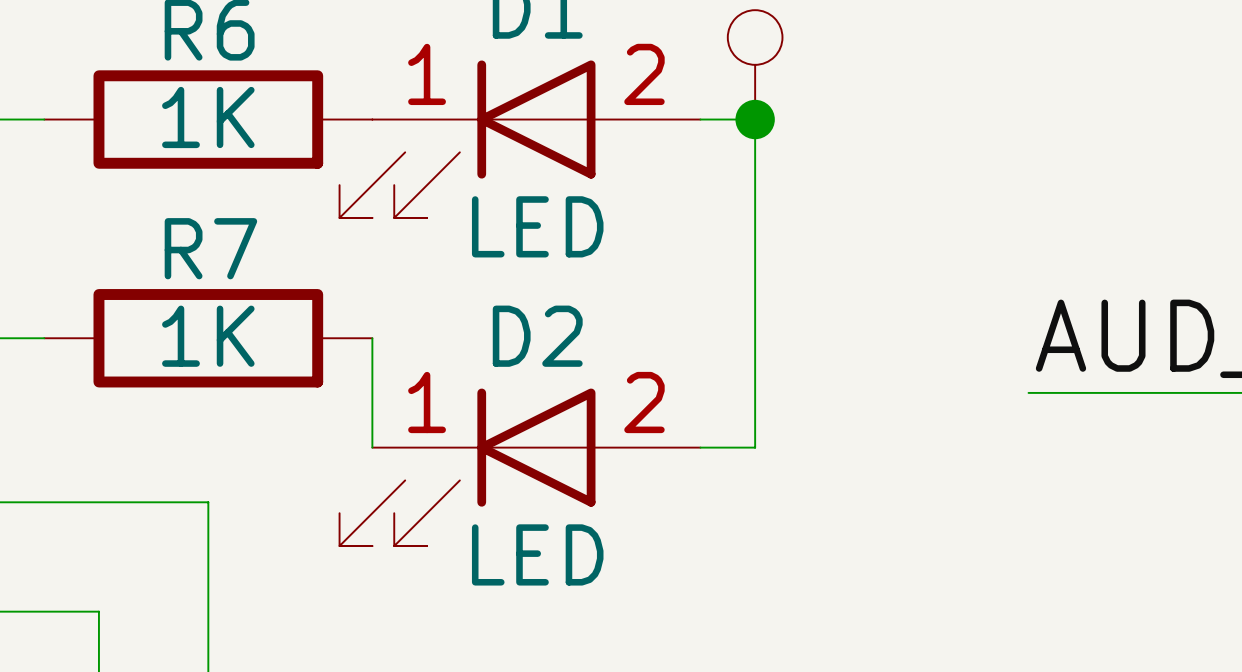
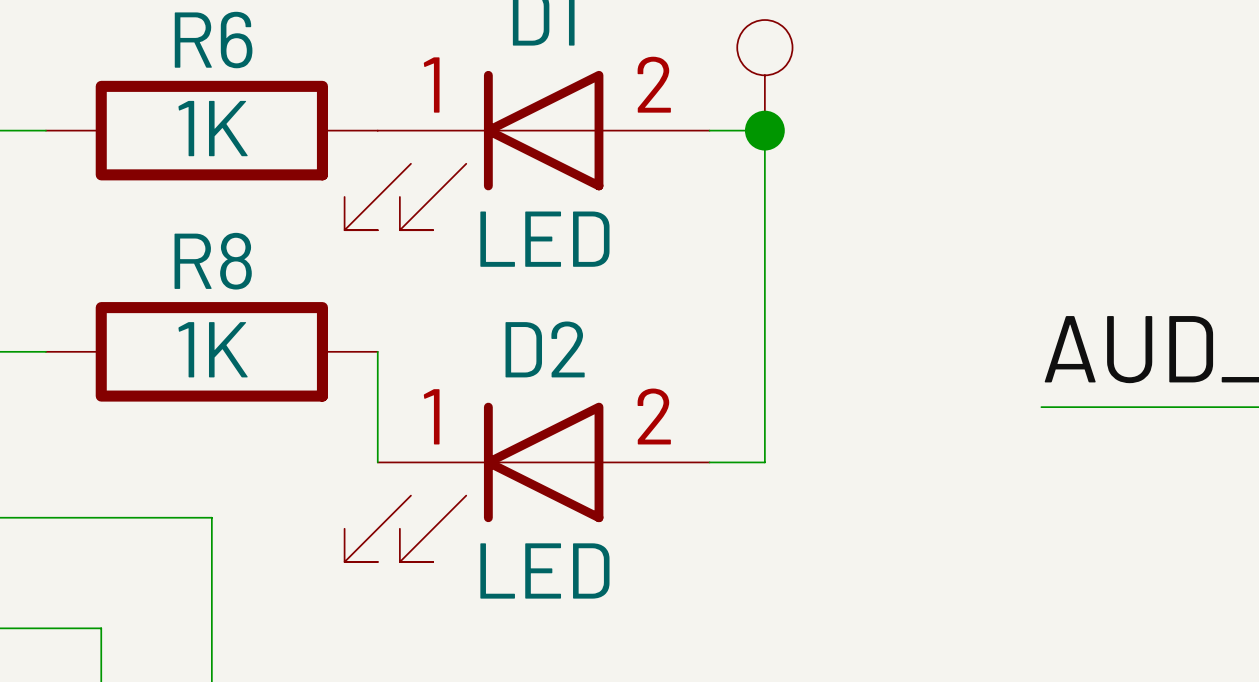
R7 name: R7 (210, 248) -> R8 (213, 261)

